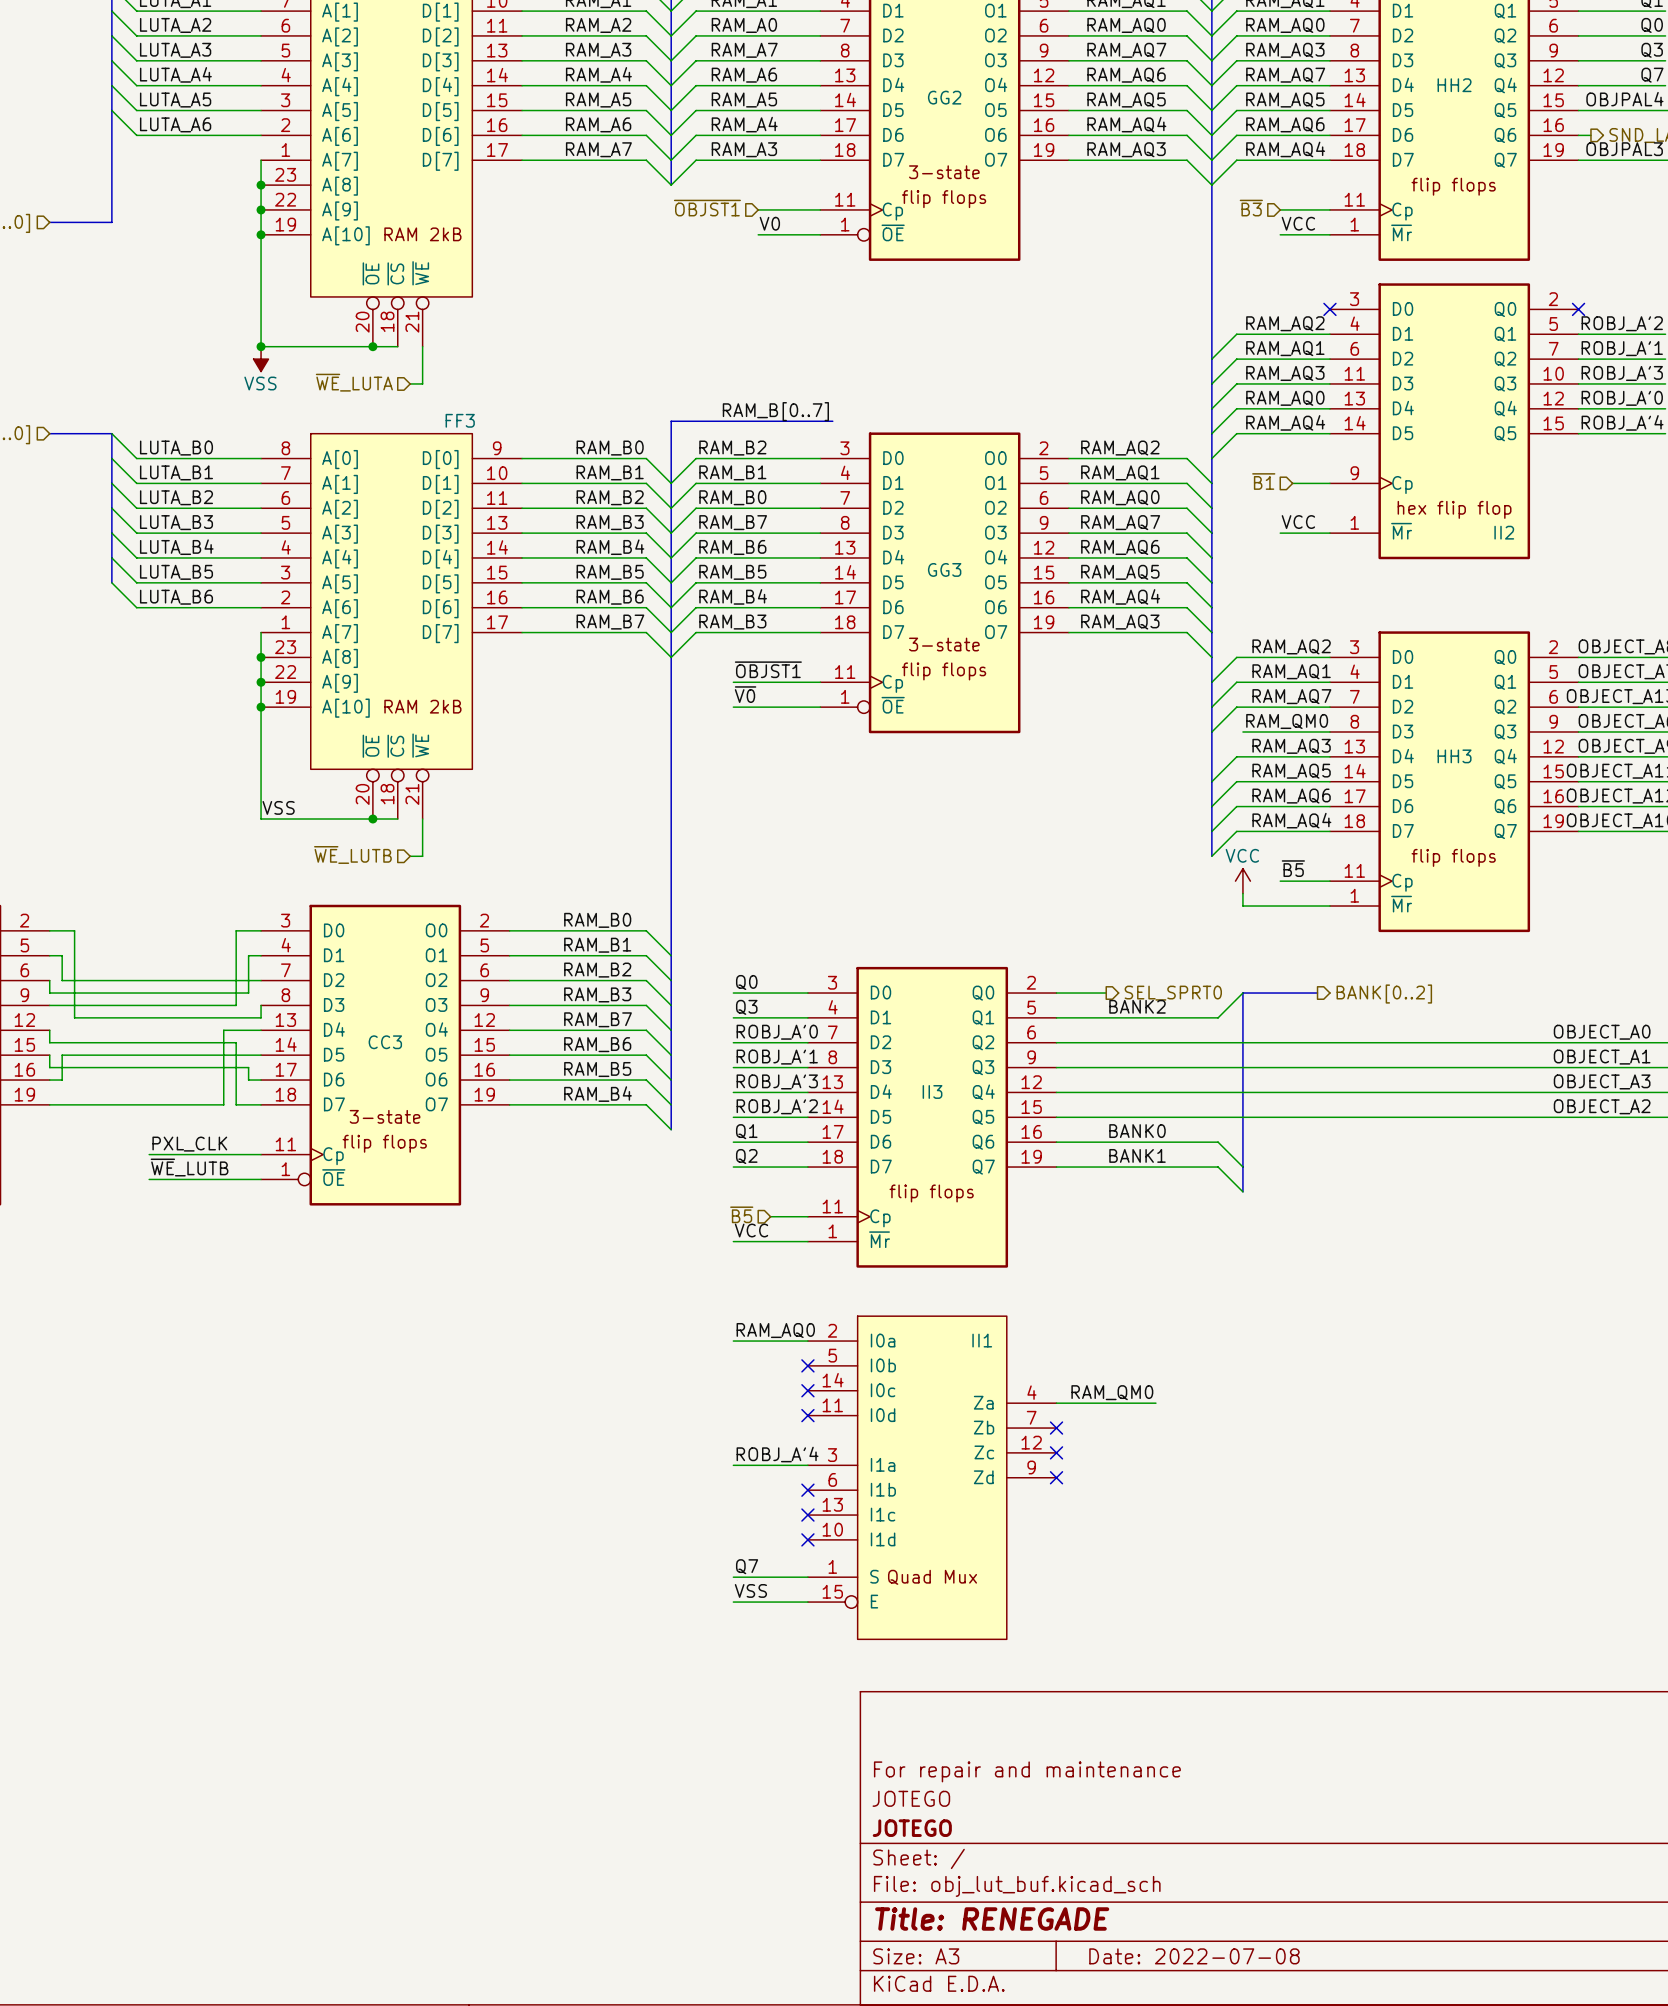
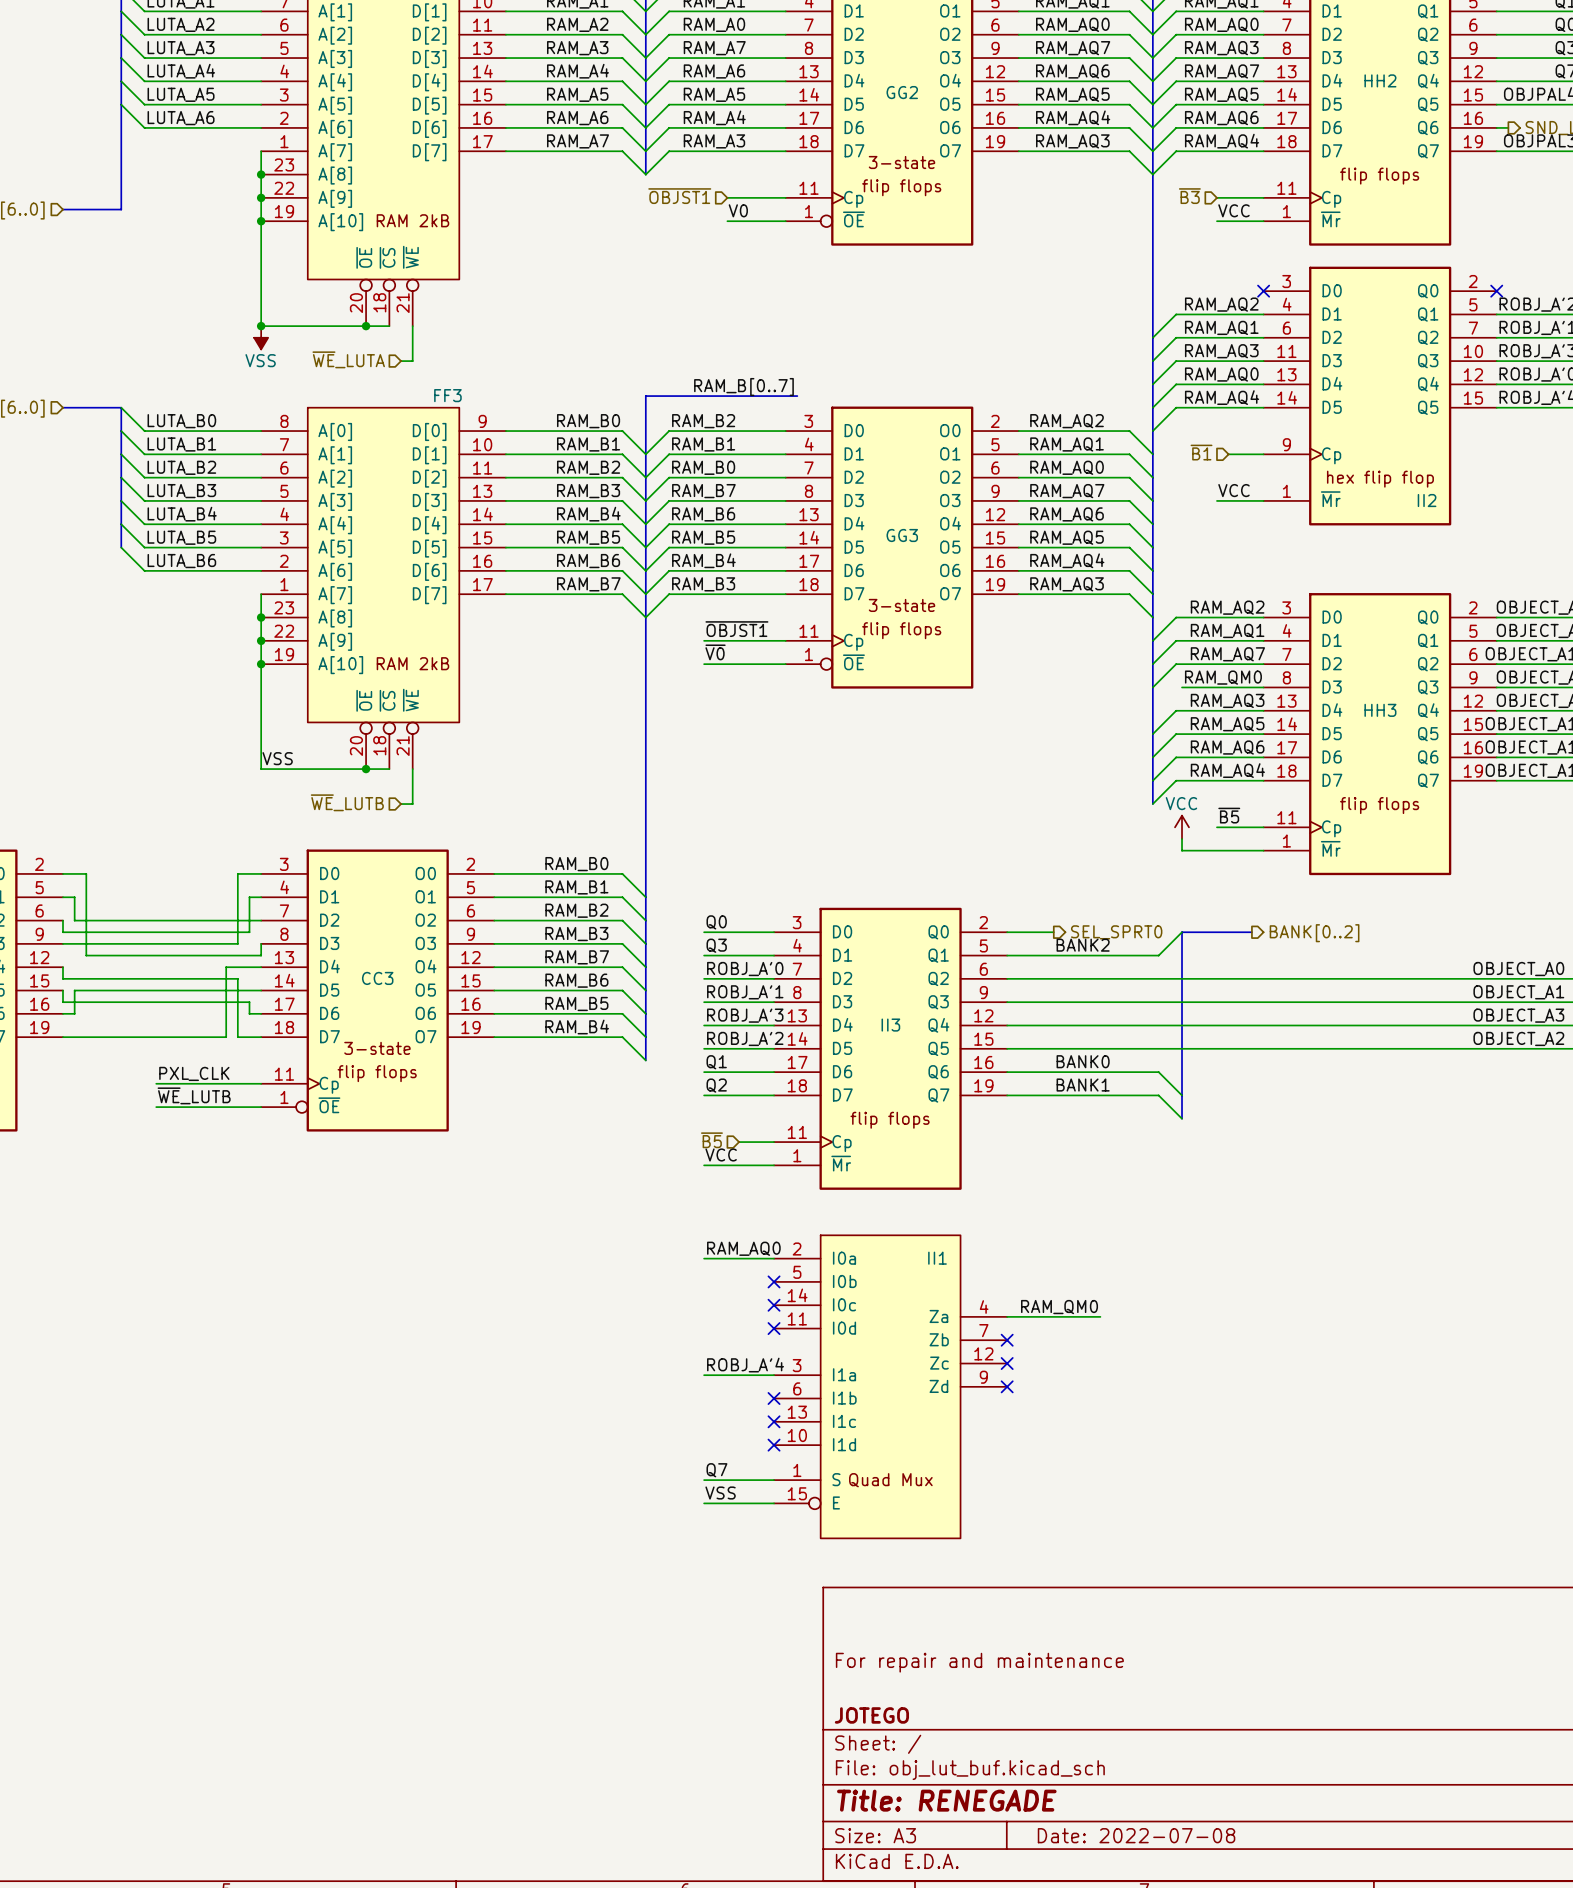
title block: JOTEGO (911, 1798) -> none

